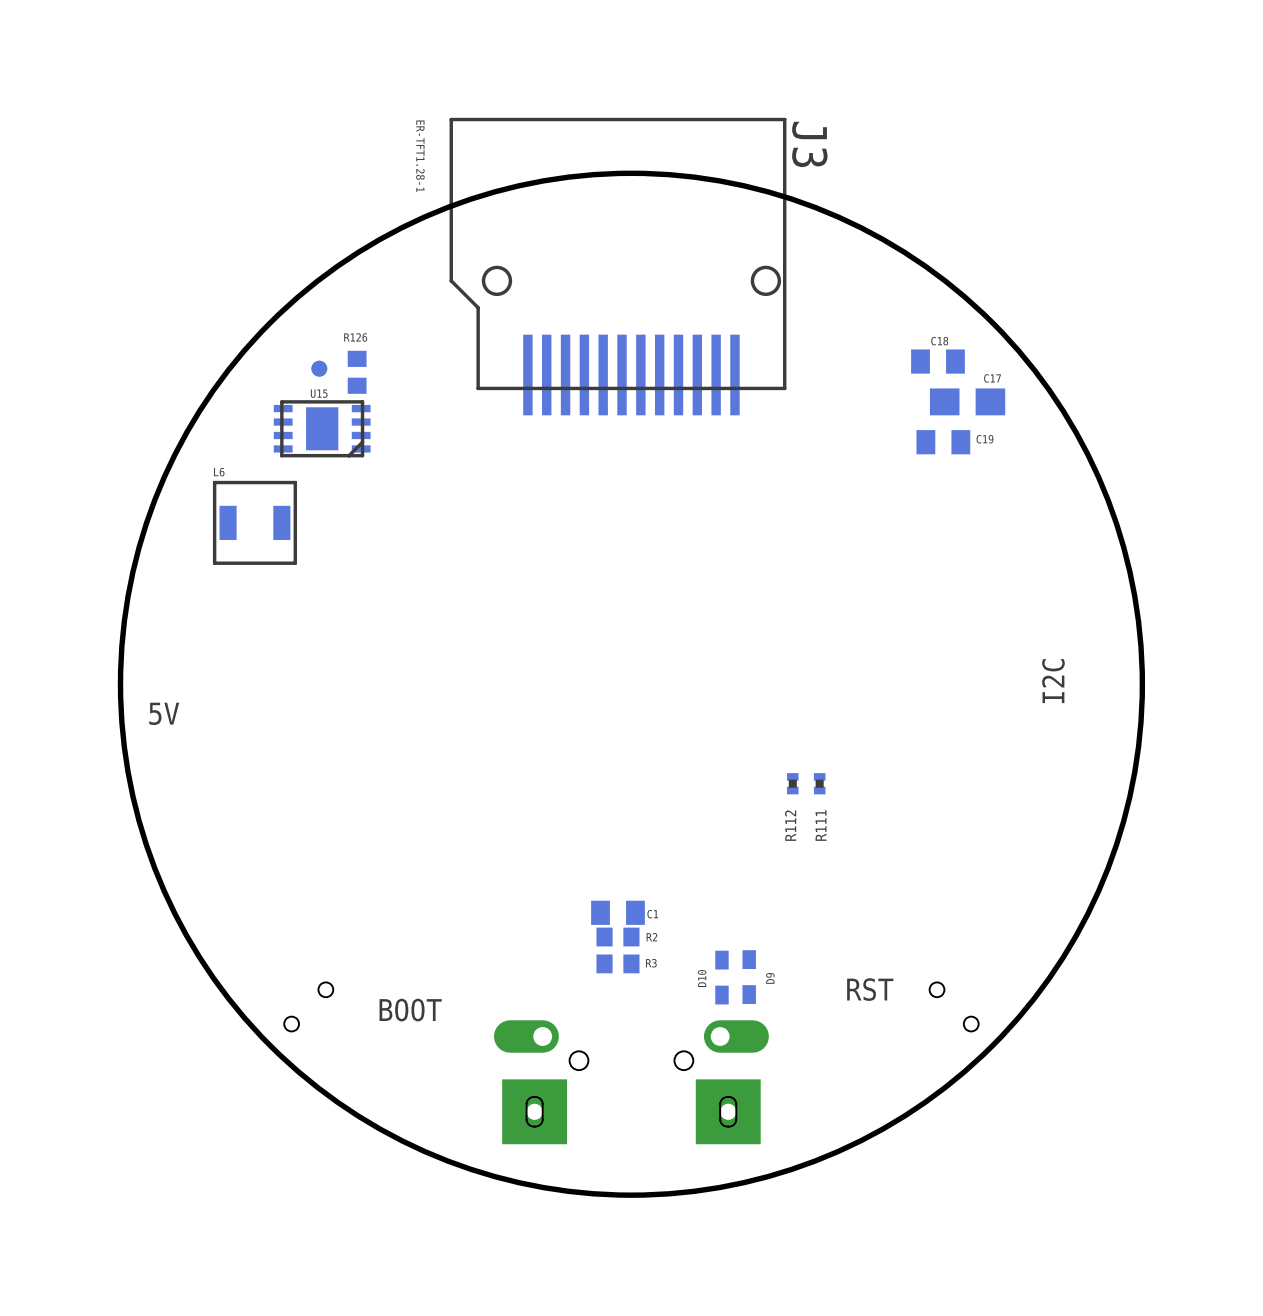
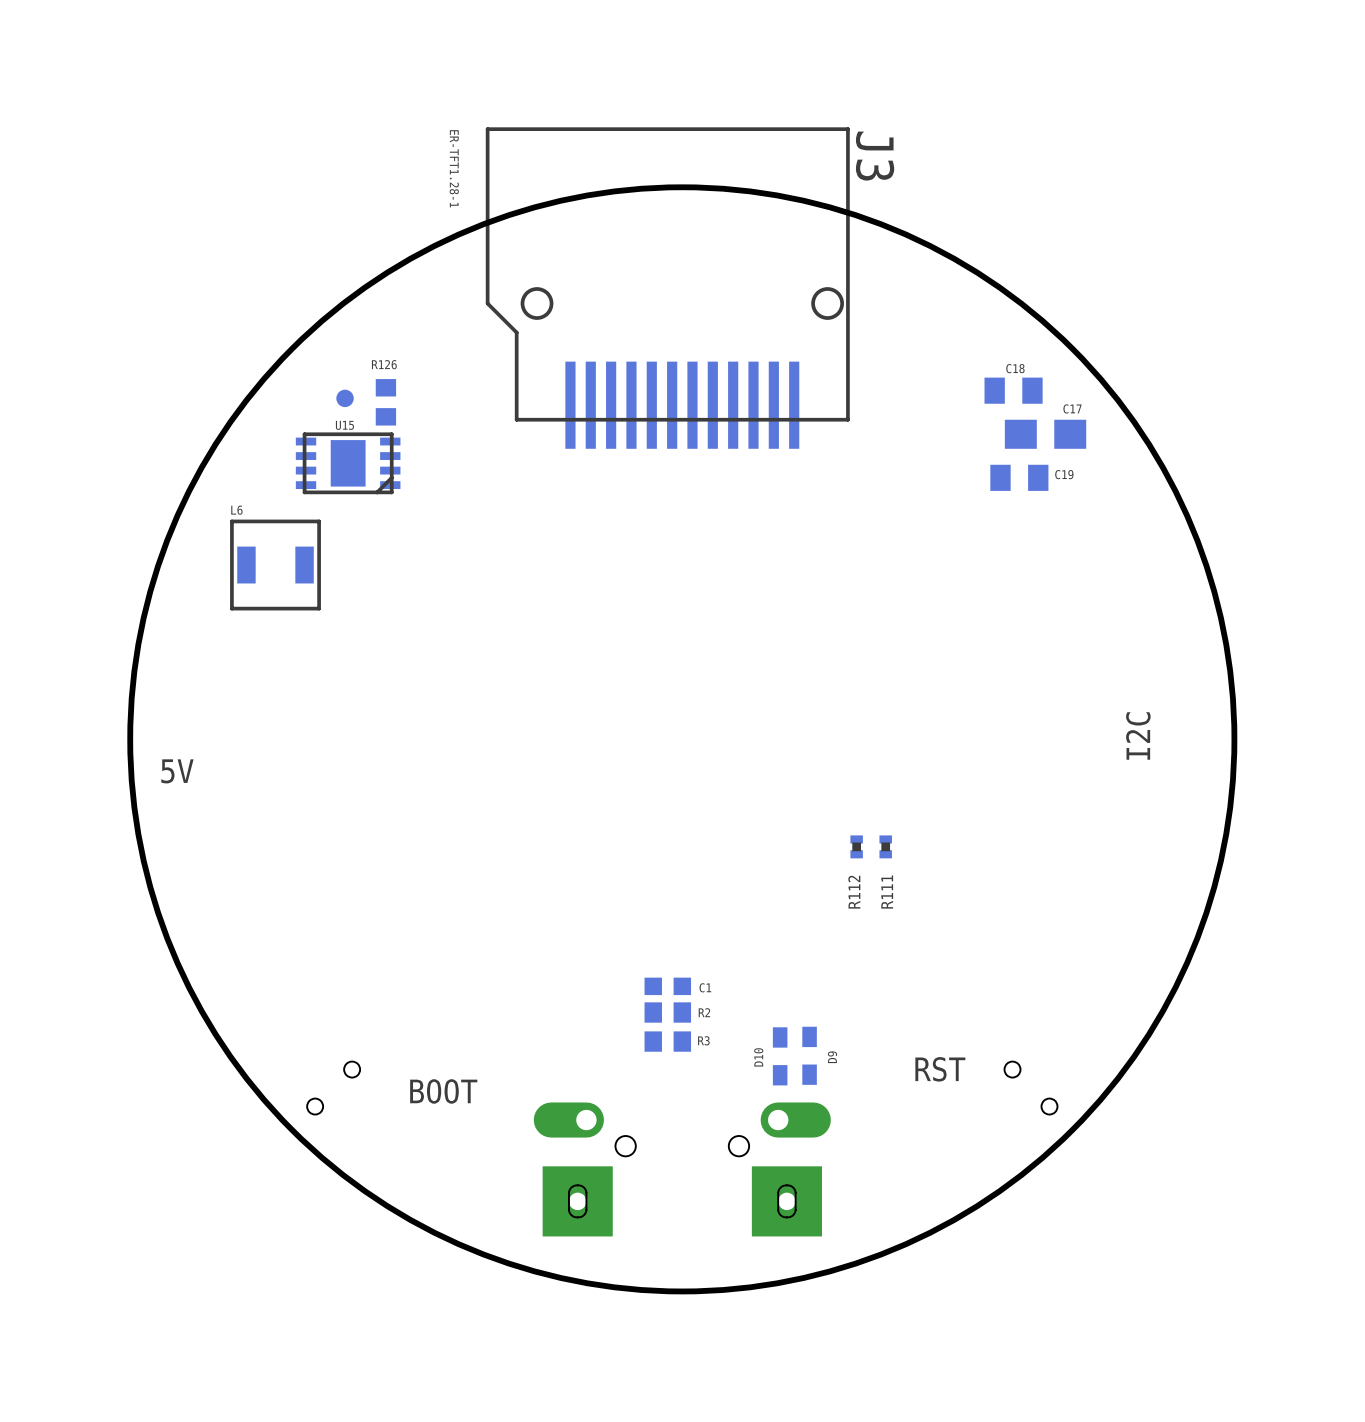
C1 footprint: [591, 900, 645, 925] -> [644, 977, 692, 996]

